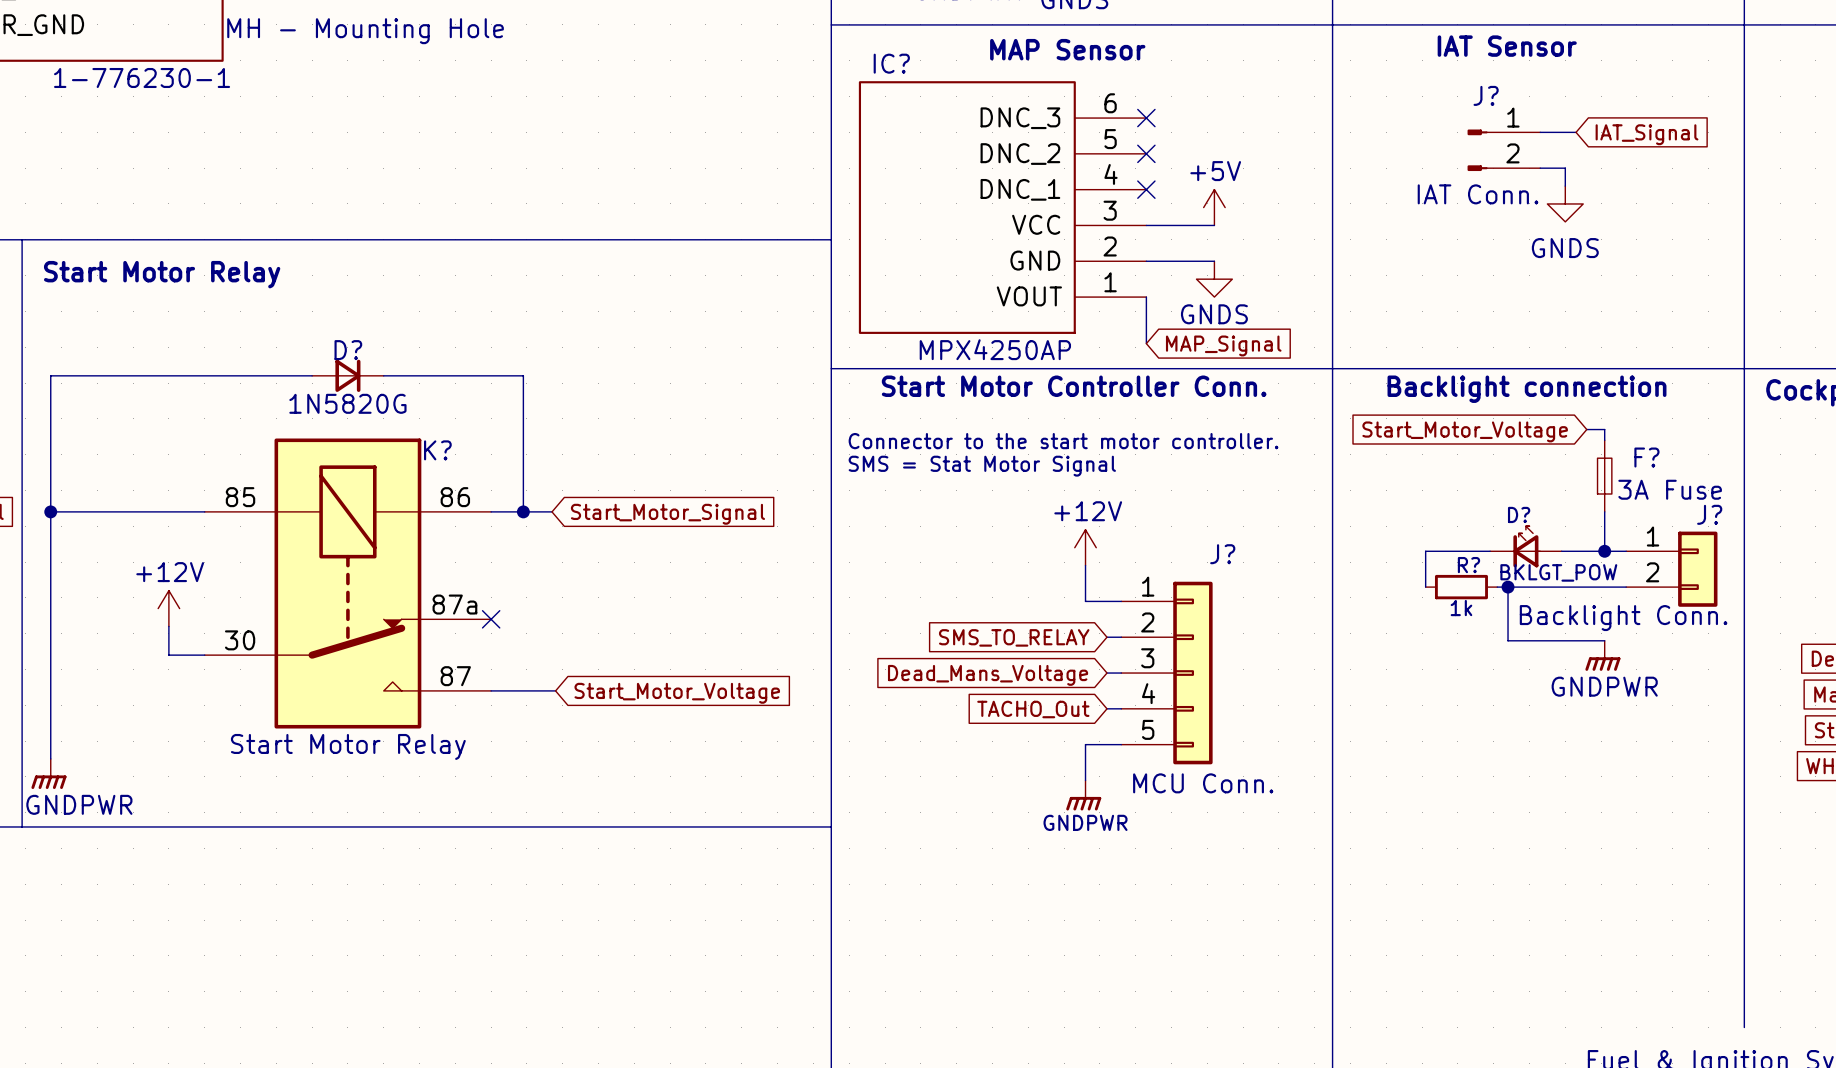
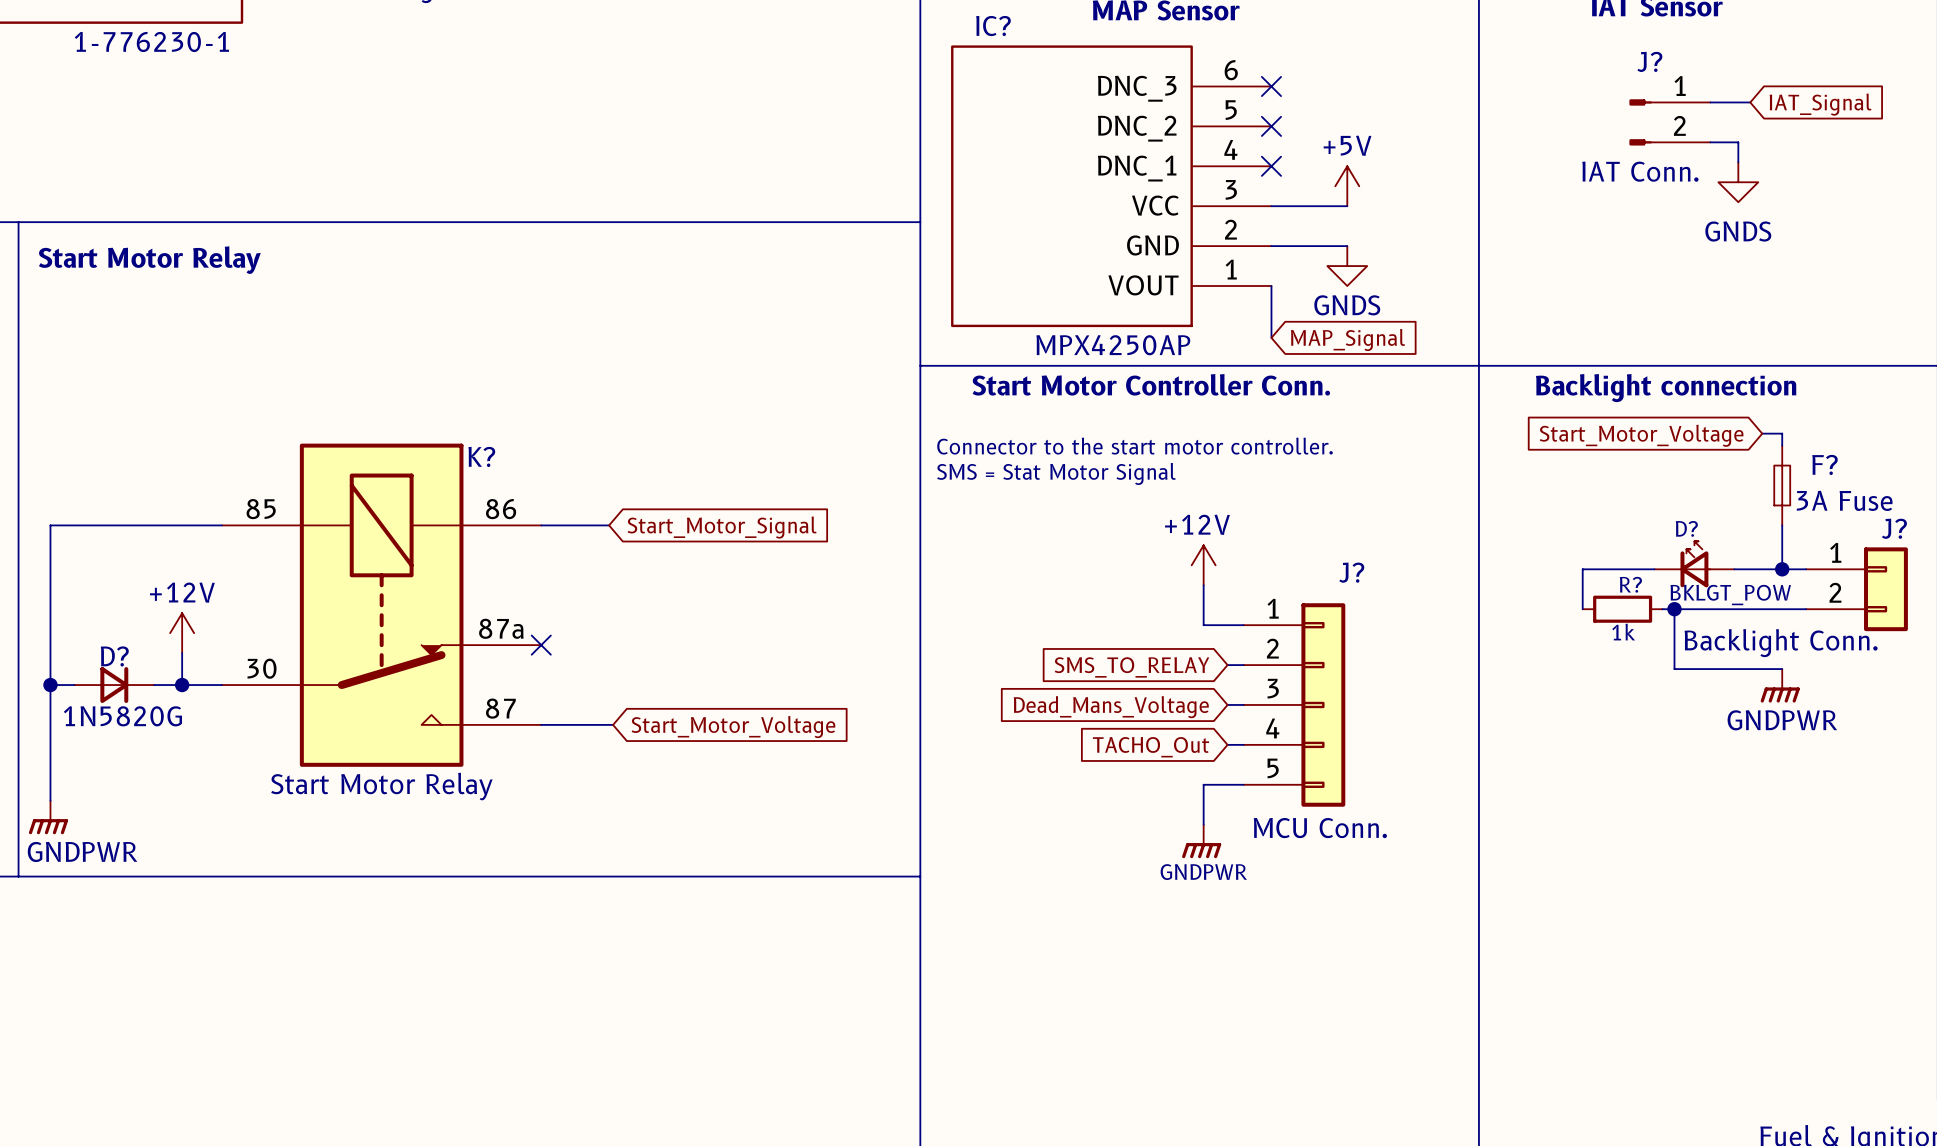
wire: (312, 375) (50, 375) (50, 511) -> none
D?: 1N5820G (347, 375) -> none
wire: (383, 375) (523, 375) (523, 511) -> none
junction: (50, 511) -> none
junction: (523, 511) -> none
wire: none -> (50, 685) (74, 685)
junction: none -> (50, 685)
D?: none -> 1N5820G (114, 685)
wire: none -> (154, 685) (182, 685)
junction: none -> (182, 685)

